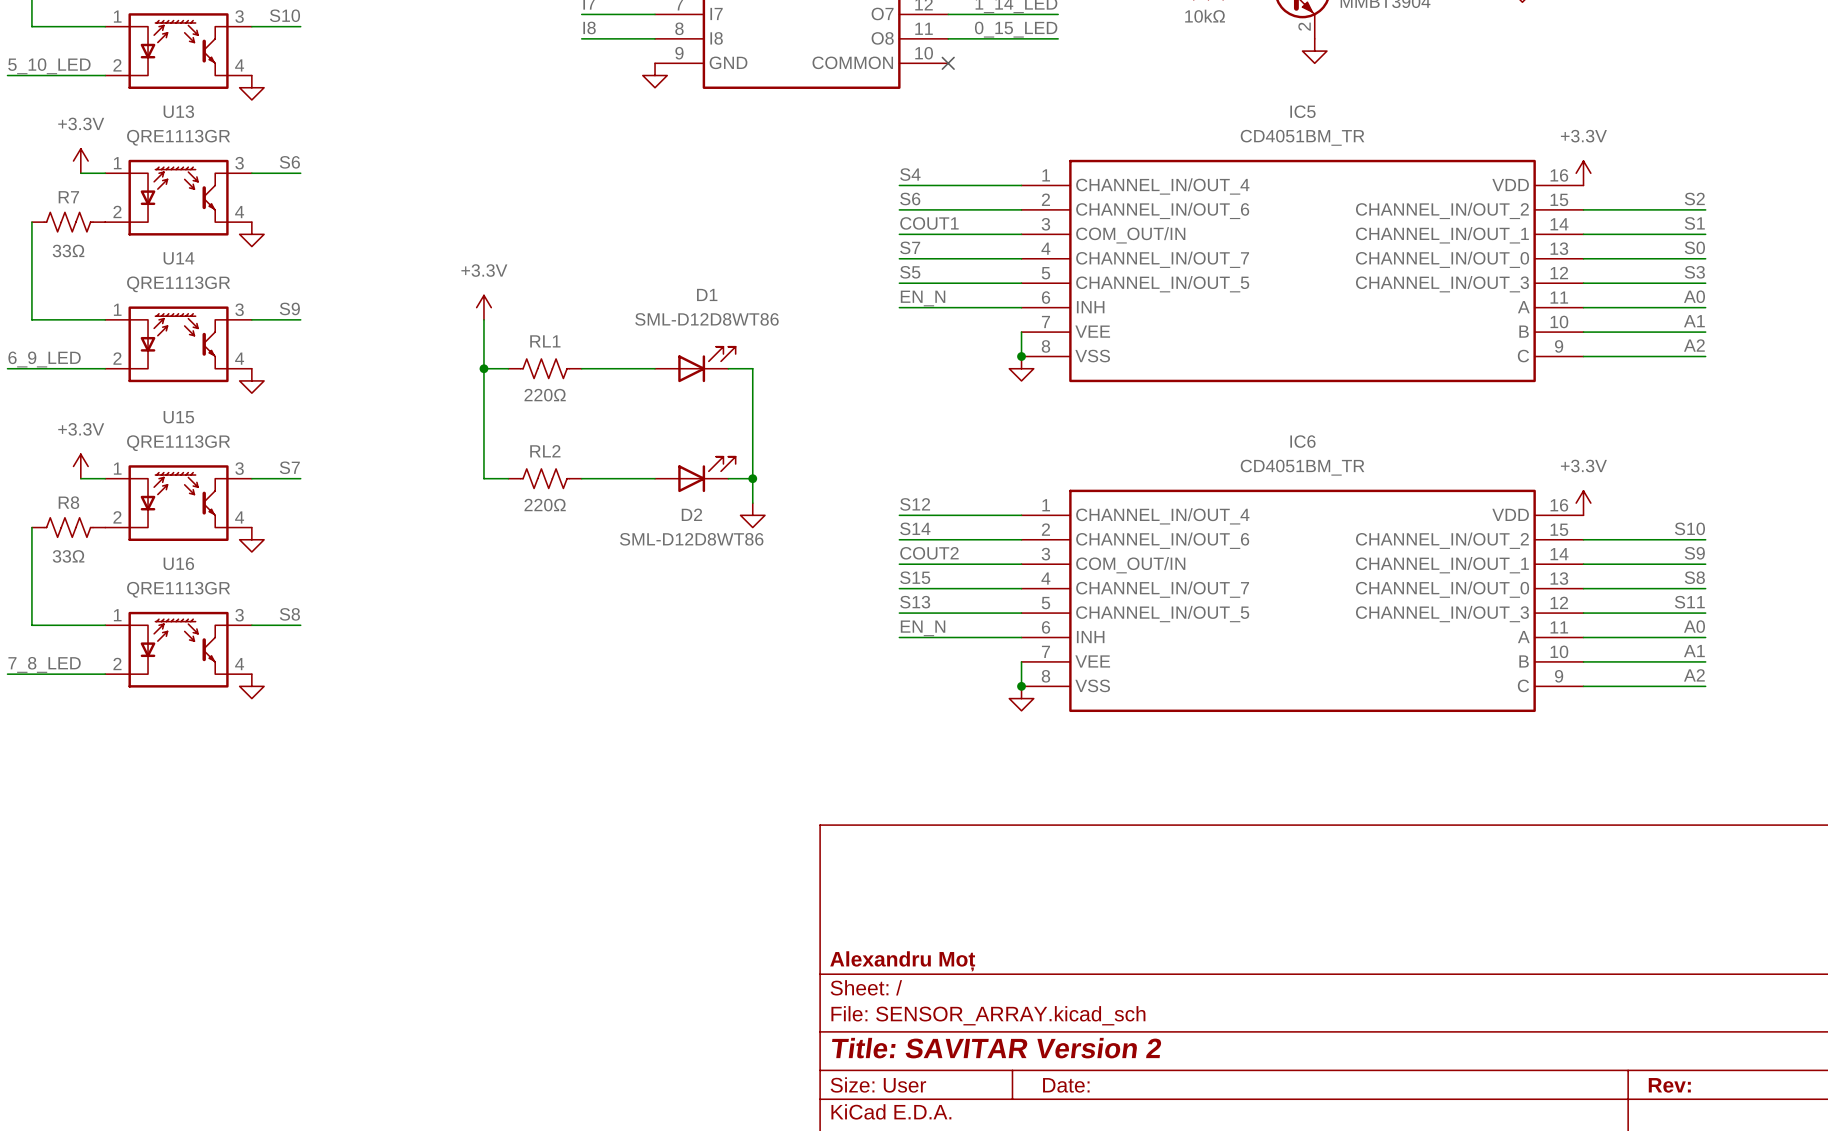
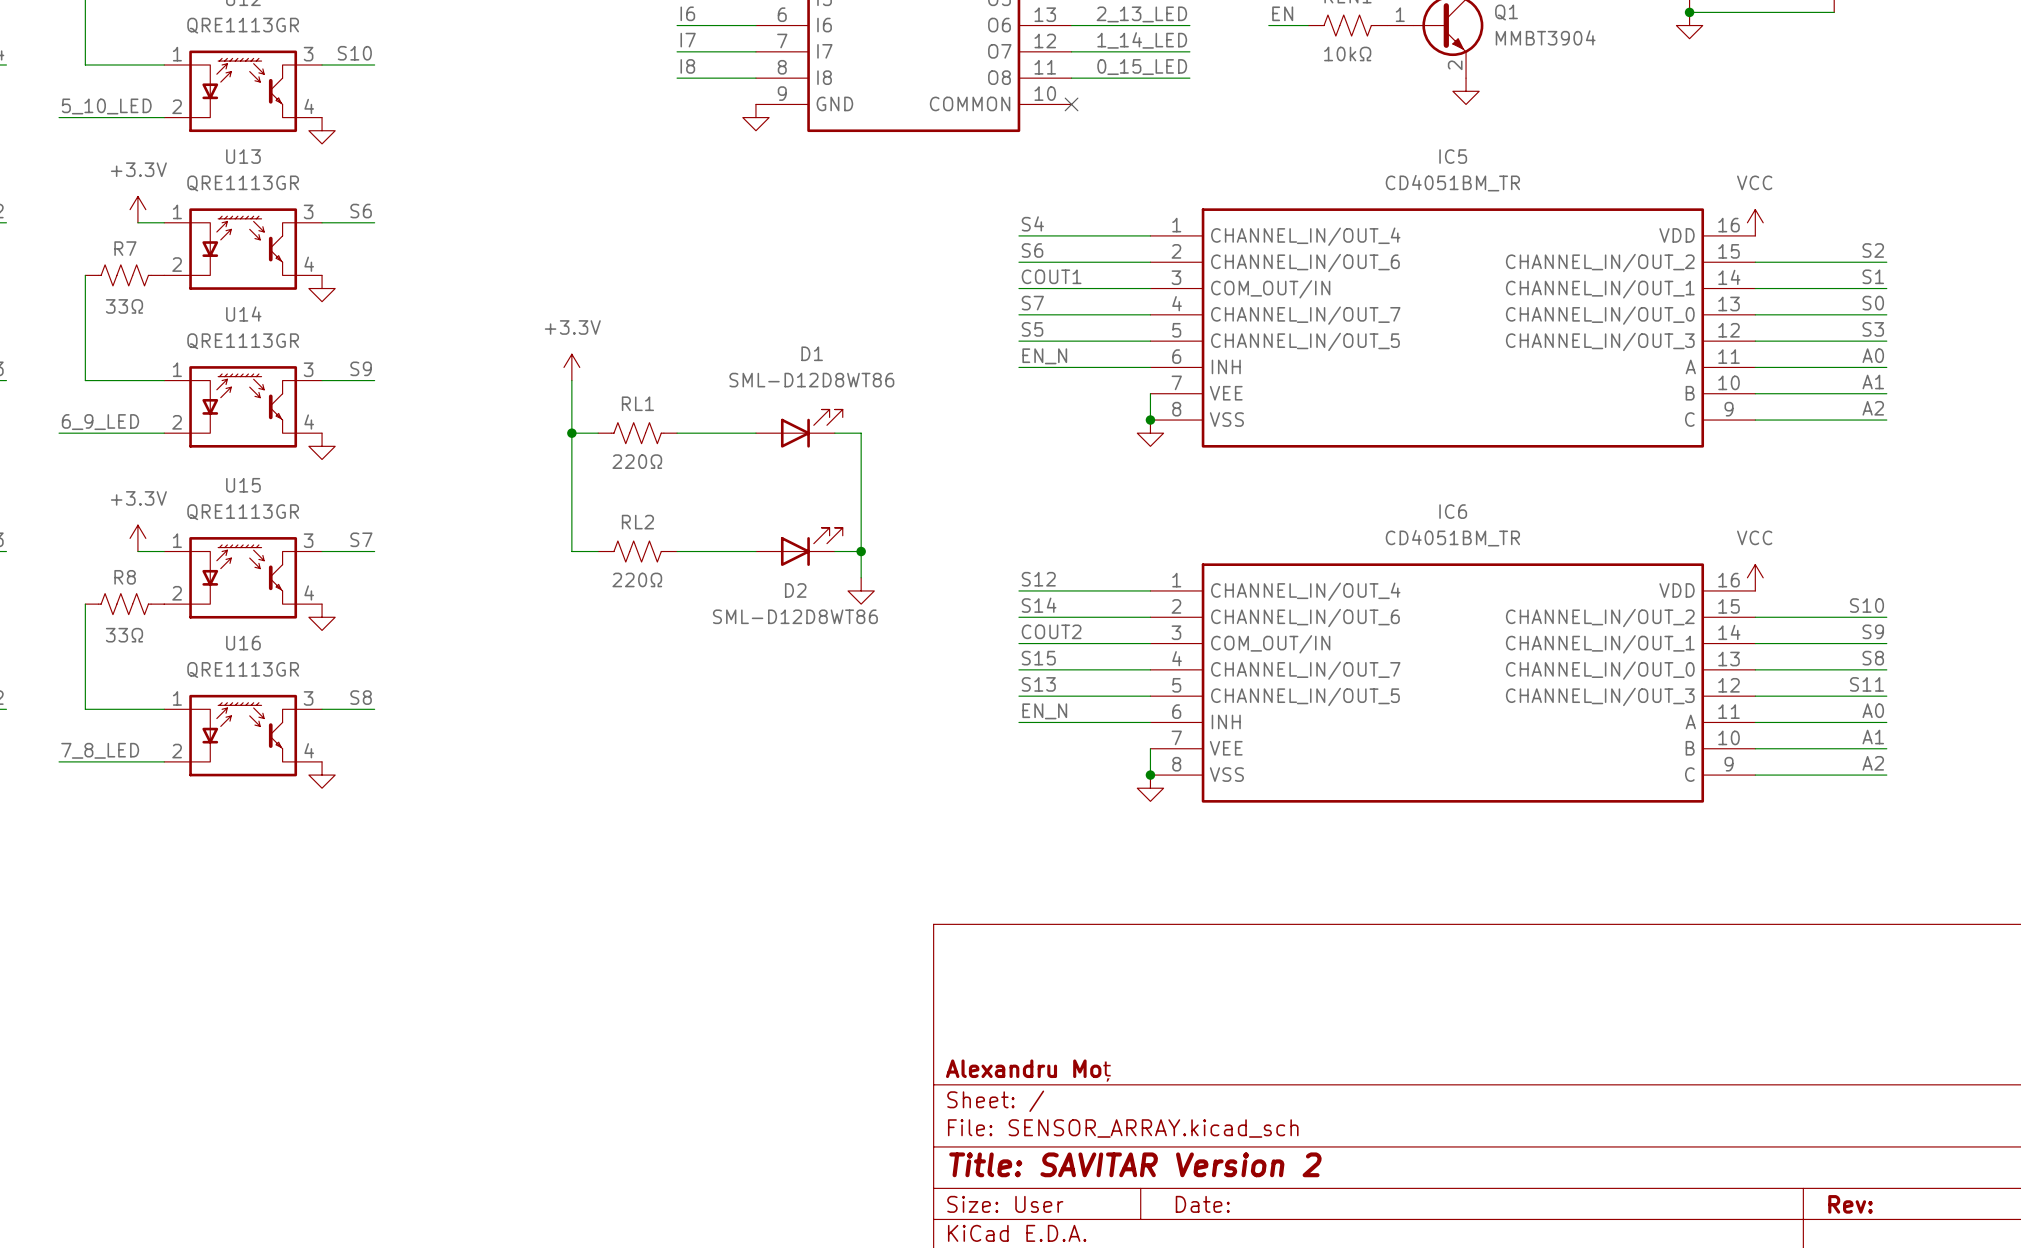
power symbol: +3.3V (1583, 173) -> VCC (1755, 222)
power symbol: +3.3V (1583, 503) -> VCC (1755, 577)

